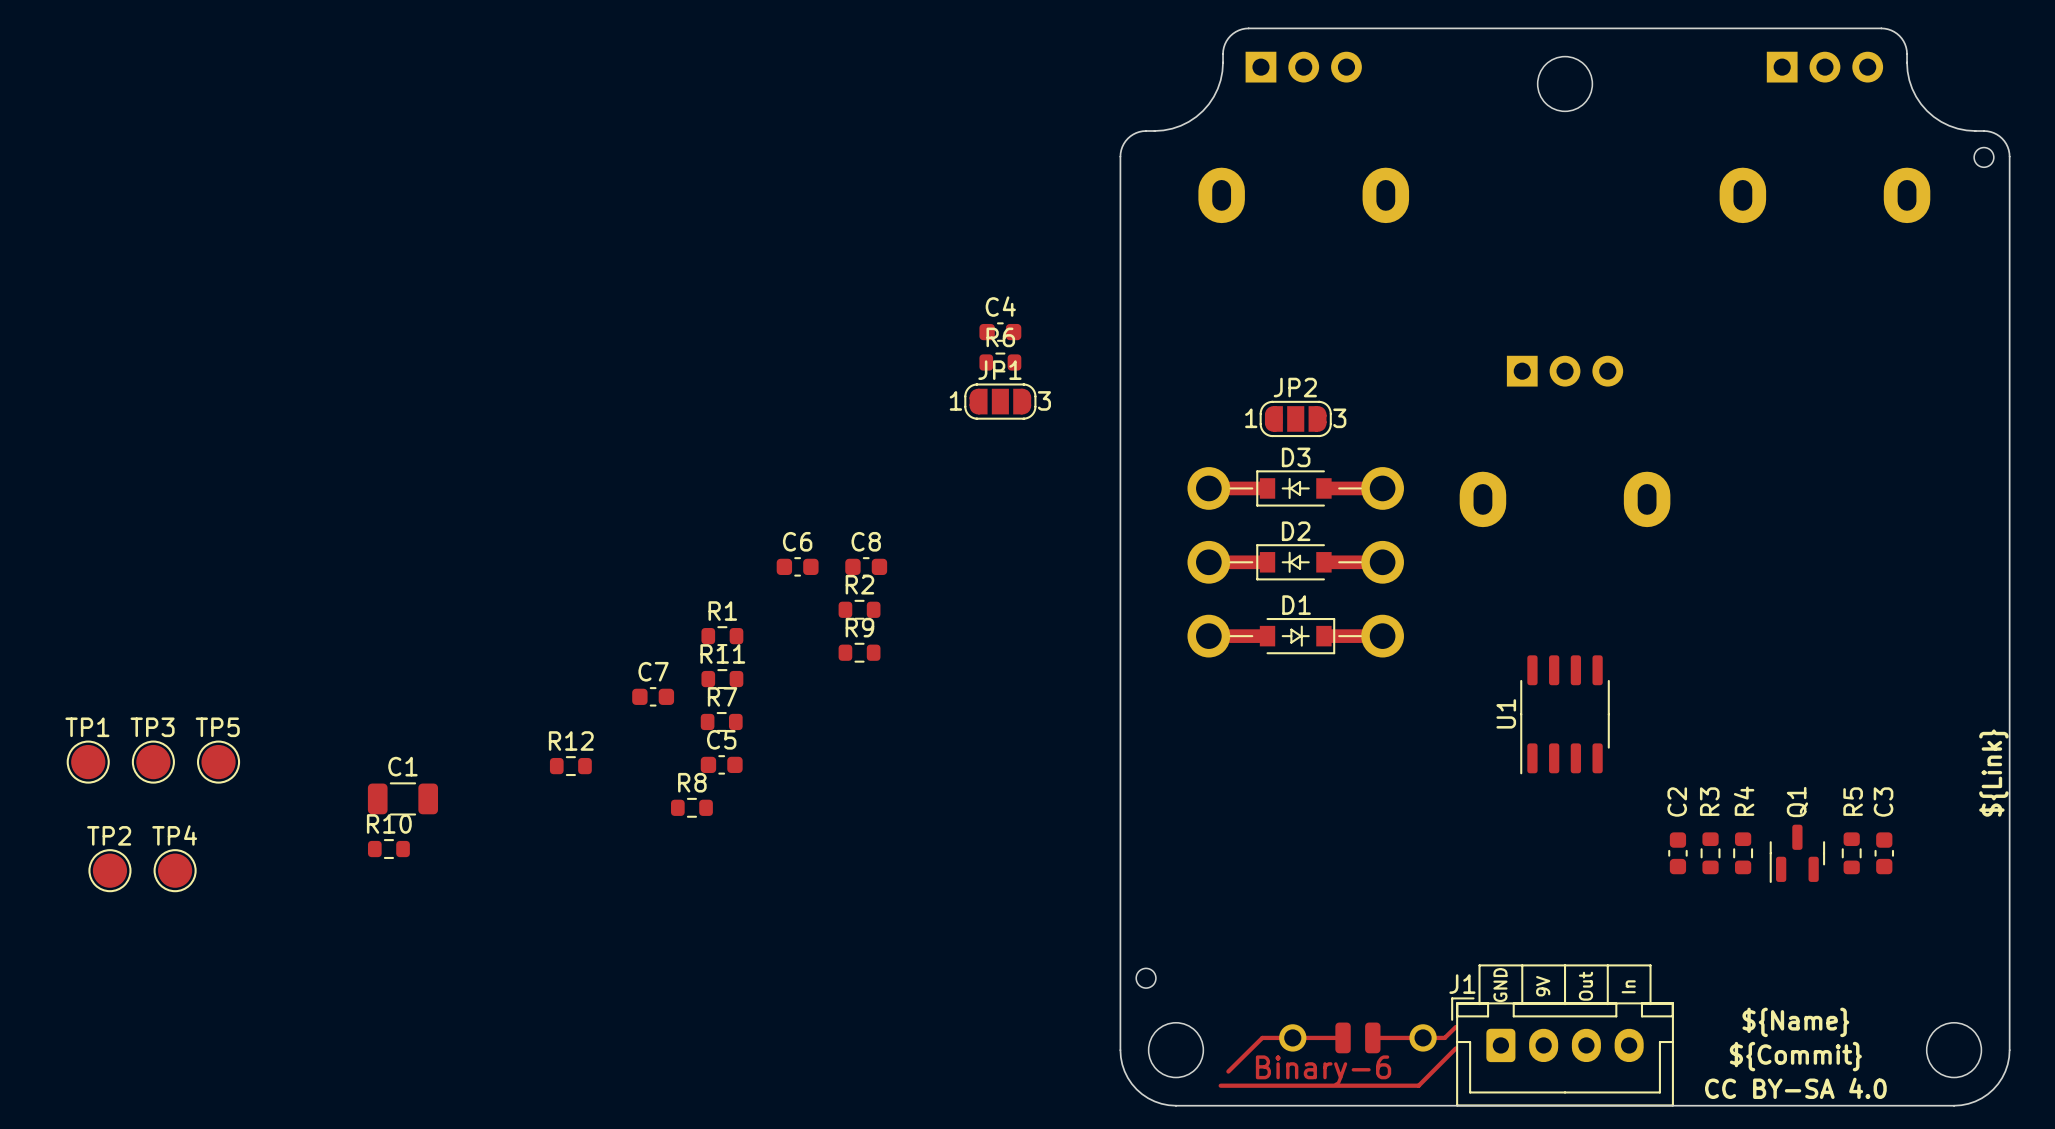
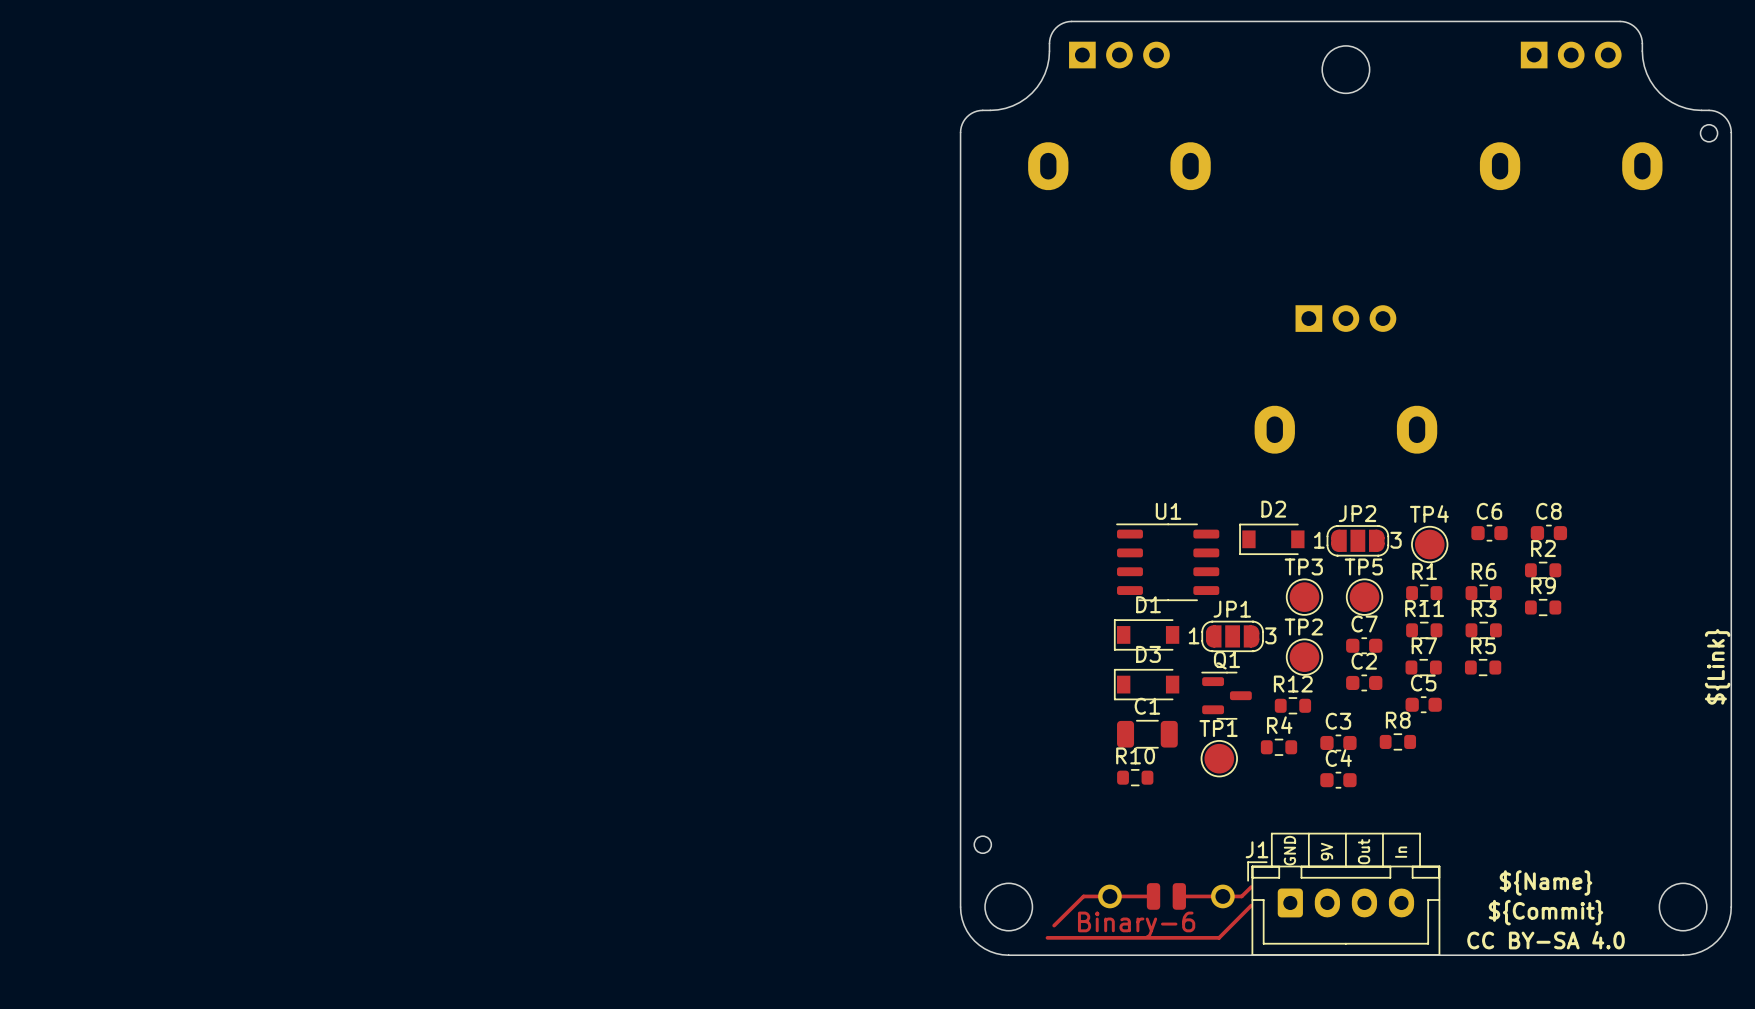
C4 position: (1000, 332) -> (1338, 780)
R6 position: (1000, 362) -> (1483, 593)
JP1 position: (1000, 401) -> (1232, 636)
JP2 position: (1295, 418) -> (1357, 540)
D3 footprint: [1187, 467, 1404, 510] -> [1113, 668, 1180, 701]
D2 footprint: [1187, 540, 1404, 584] -> [1239, 523, 1305, 556]
C6 position: (797, 566) -> (1489, 533)
C8 position: (866, 566) -> (1548, 533)
R2 position: (859, 609) -> (1543, 570)
D1 footprint: [1187, 614, 1404, 658] -> [1113, 619, 1180, 651]
R1 position: (722, 636) -> (1424, 593)
R9 position: (859, 652) -> (1543, 607)
R11 position: (722, 679) -> (1424, 630)
C7 position: (653, 696) -> (1364, 645)
U1 rotation: 0° (1565, 714) -> 90° clockwise (1167, 562)
U1 position: (1565, 714) -> (1167, 562)
R7 position: (721, 721) -> (1423, 667)
TP1 position: (88, 762) -> (1219, 758)
TP3 position: (153, 762) -> (1304, 597)
TP5 position: (218, 762) -> (1364, 597)
C5 position: (721, 764) -> (1423, 704)
R12 position: (570, 766) -> (1292, 705)
C1 position: (402, 798) -> (1147, 734)
R8 position: (691, 807) -> (1397, 741)
R10 position: (388, 849) -> (1135, 777)
C2 rotation: 0° (1677, 853) -> 90° clockwise (1364, 682)
C2 position: (1677, 853) -> (1364, 682)
R3 rotation: 0° (1710, 853) -> 90° clockwise (1483, 630)
R3 position: (1710, 853) -> (1483, 630)
R4 rotation: 0° (1743, 853) -> 90° clockwise (1279, 747)
R4 position: (1743, 853) -> (1279, 747)
Q1 rotation: 0° (1797, 853) -> 90° clockwise (1226, 695)
Q1 position: (1797, 853) -> (1226, 695)
R5 rotation: 0° (1851, 853) -> 90° clockwise (1483, 667)
R5 position: (1851, 853) -> (1483, 667)
C3 rotation: 0° (1884, 853) -> 90° clockwise (1338, 742)
C3 position: (1884, 853) -> (1338, 742)
TP2 position: (109, 870) -> (1304, 657)
TP4 position: (175, 870) -> (1429, 544)

